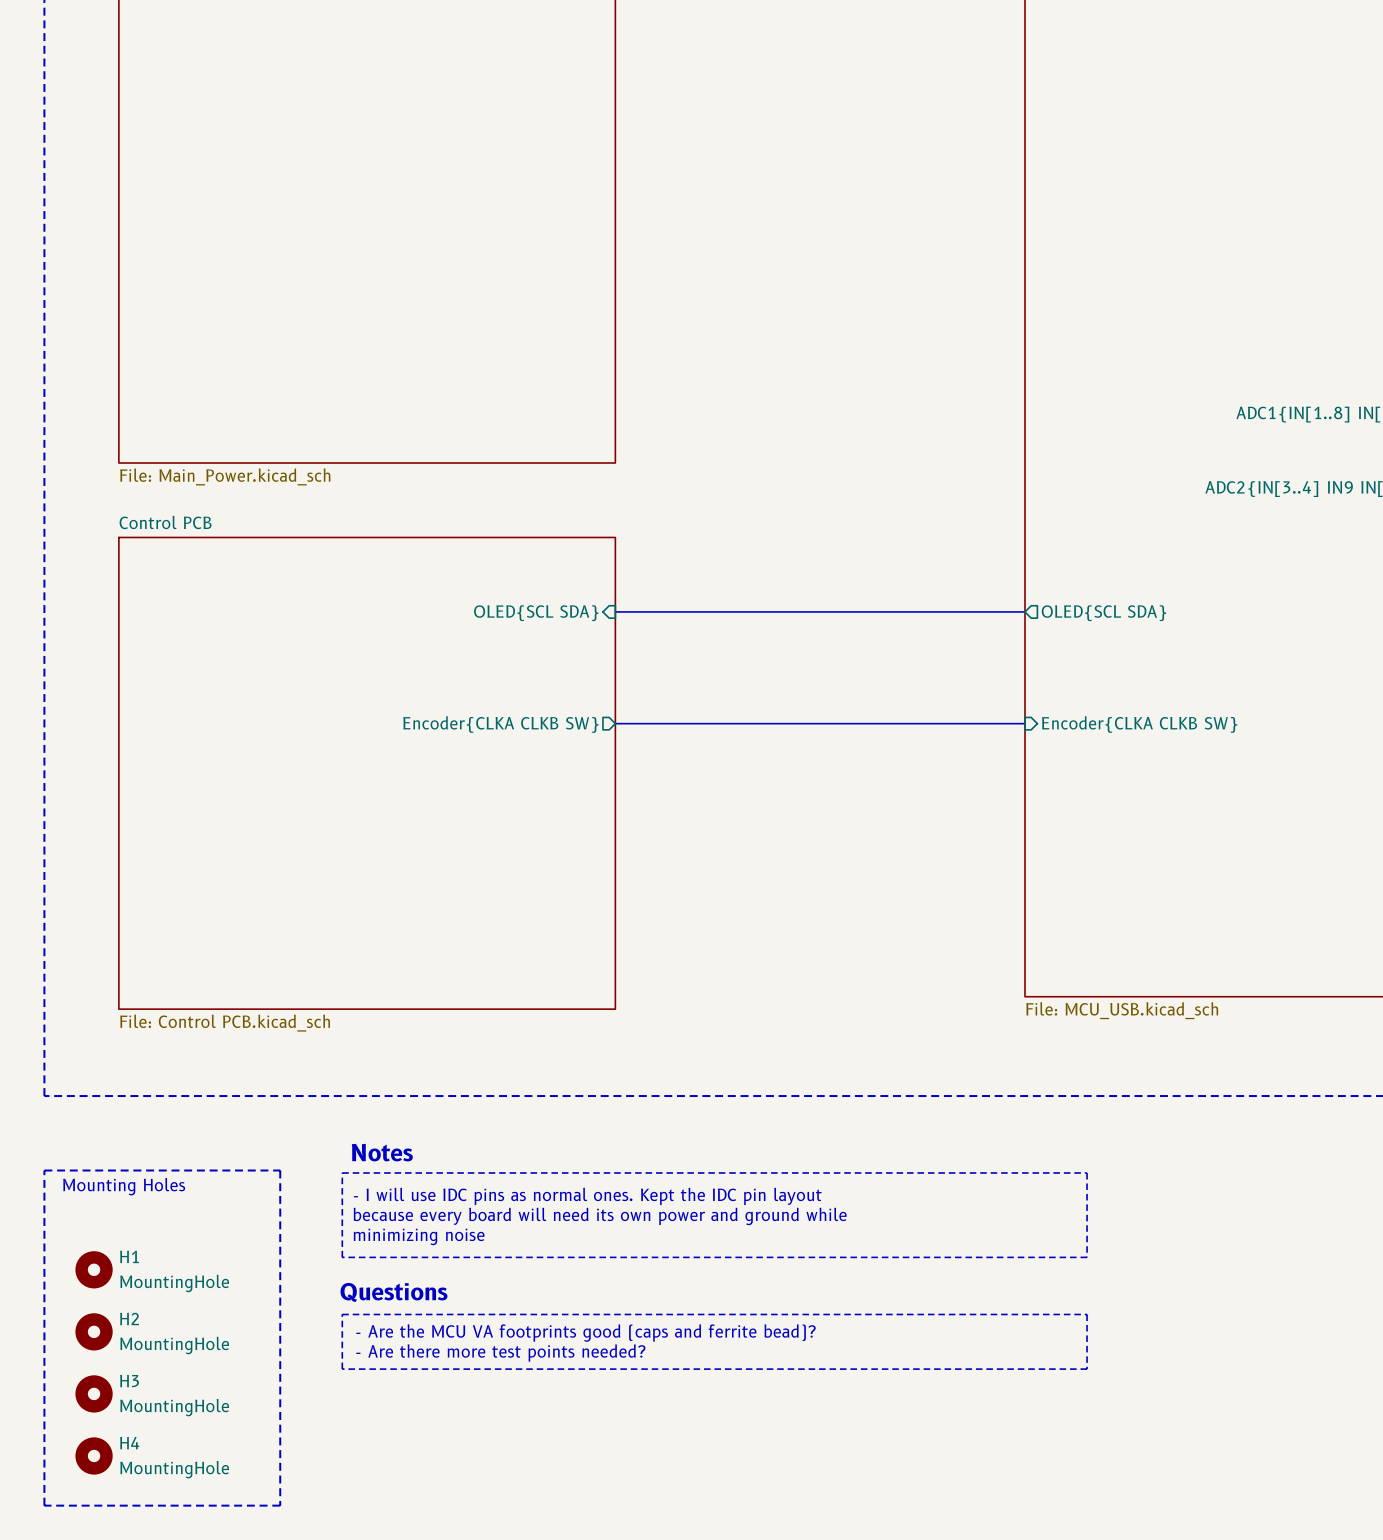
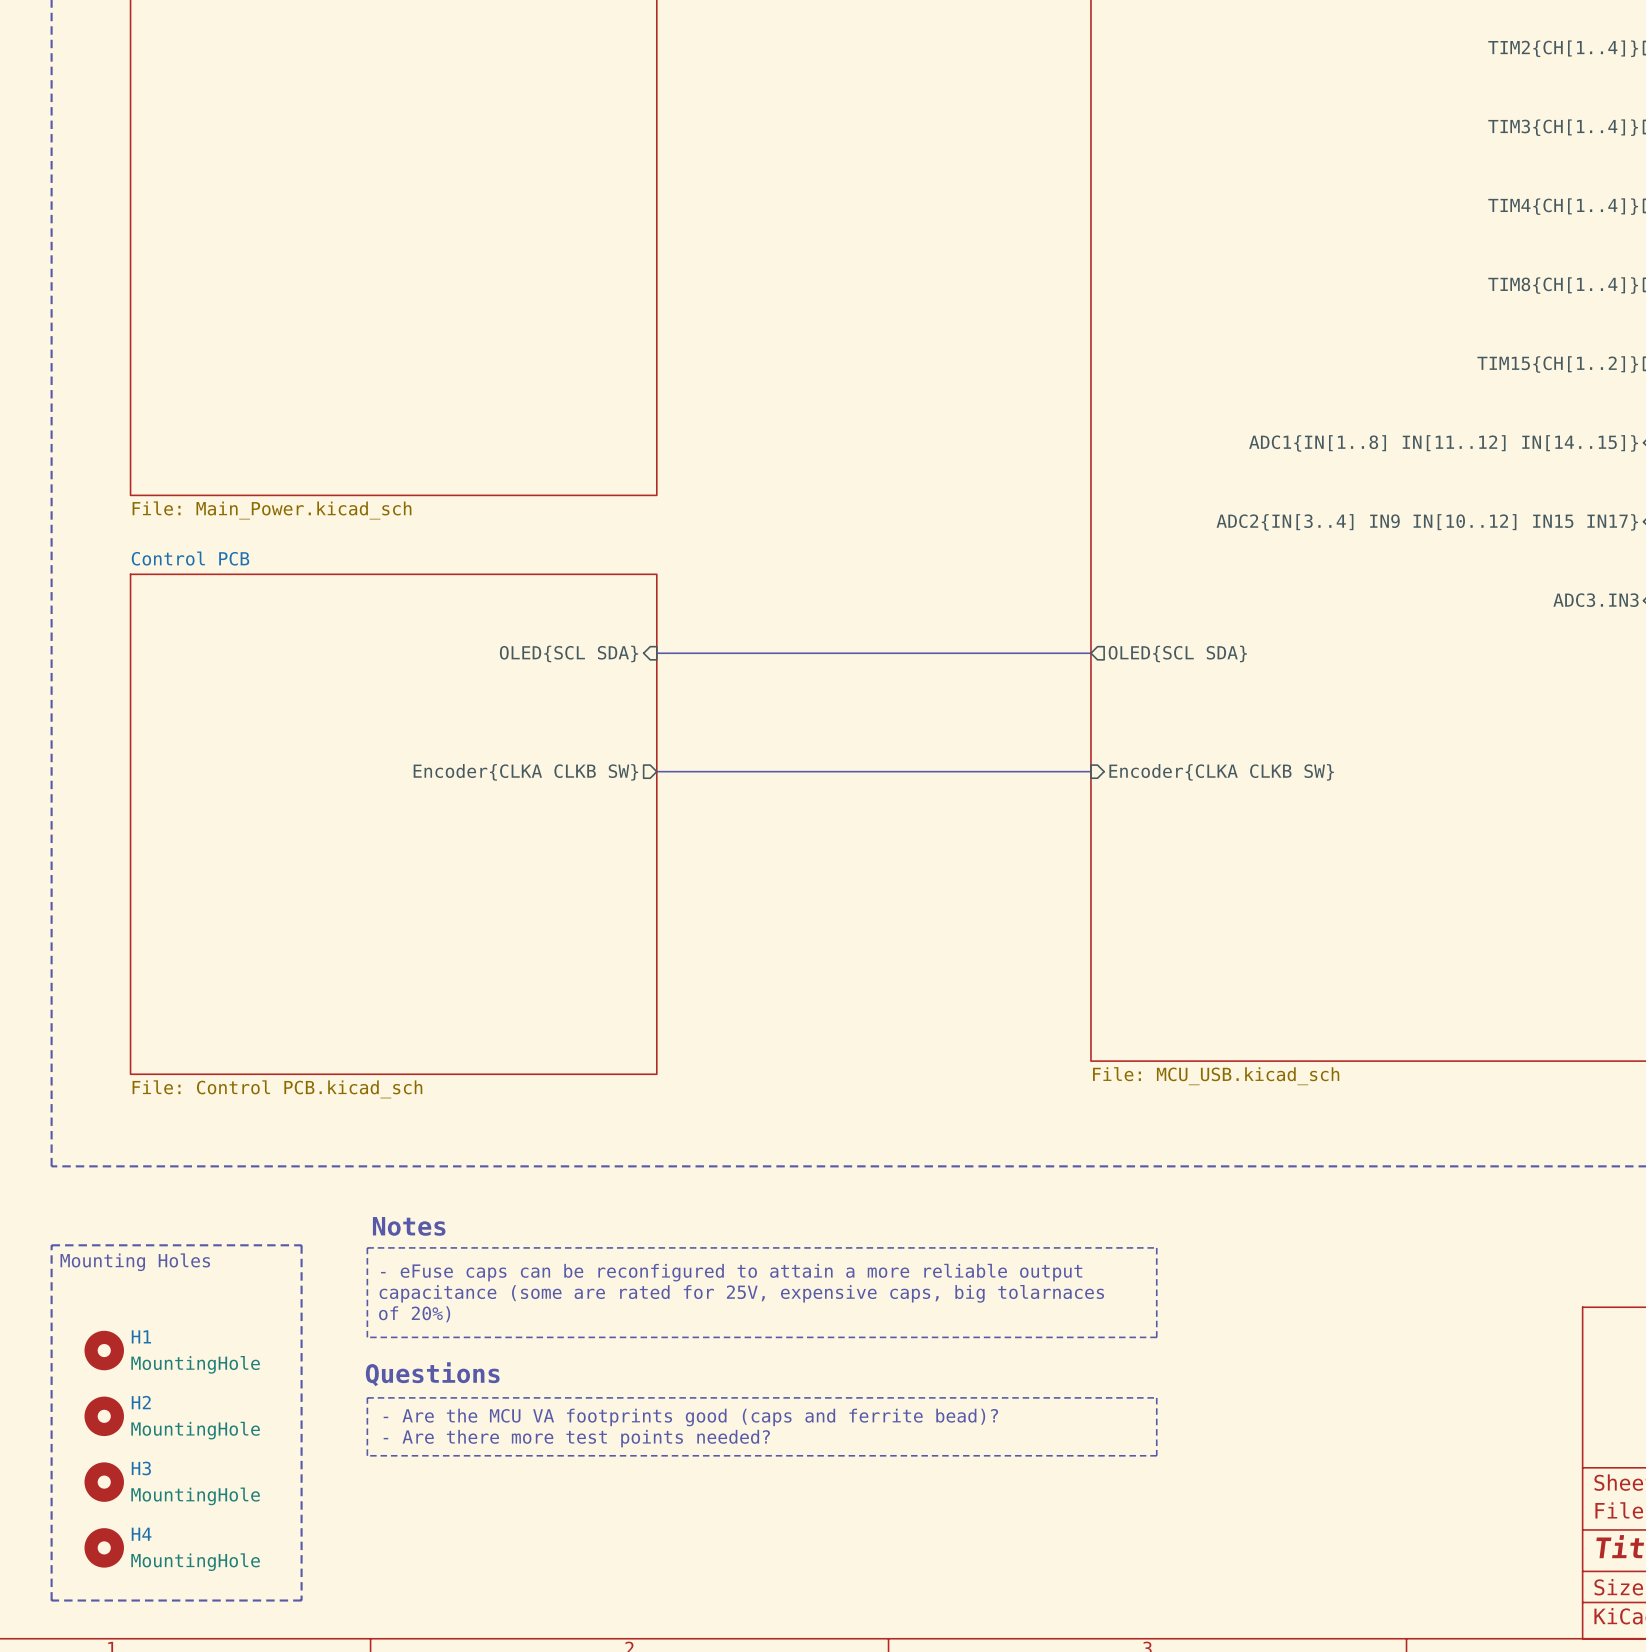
text: - I will use IDC pins as normal ones. Kept the IDC pin layout (587, 1196) -> - eFuse caps can be reconfigured to attain a more reliable output (731, 1272)
text: because every board will need its own power and ground while (600, 1216) -> capacitance (some are rated for 25V, expensive caps, big tolarnaces (741, 1293)
text: minimizing noise (419, 1236) -> of 20%) (414, 1314)

